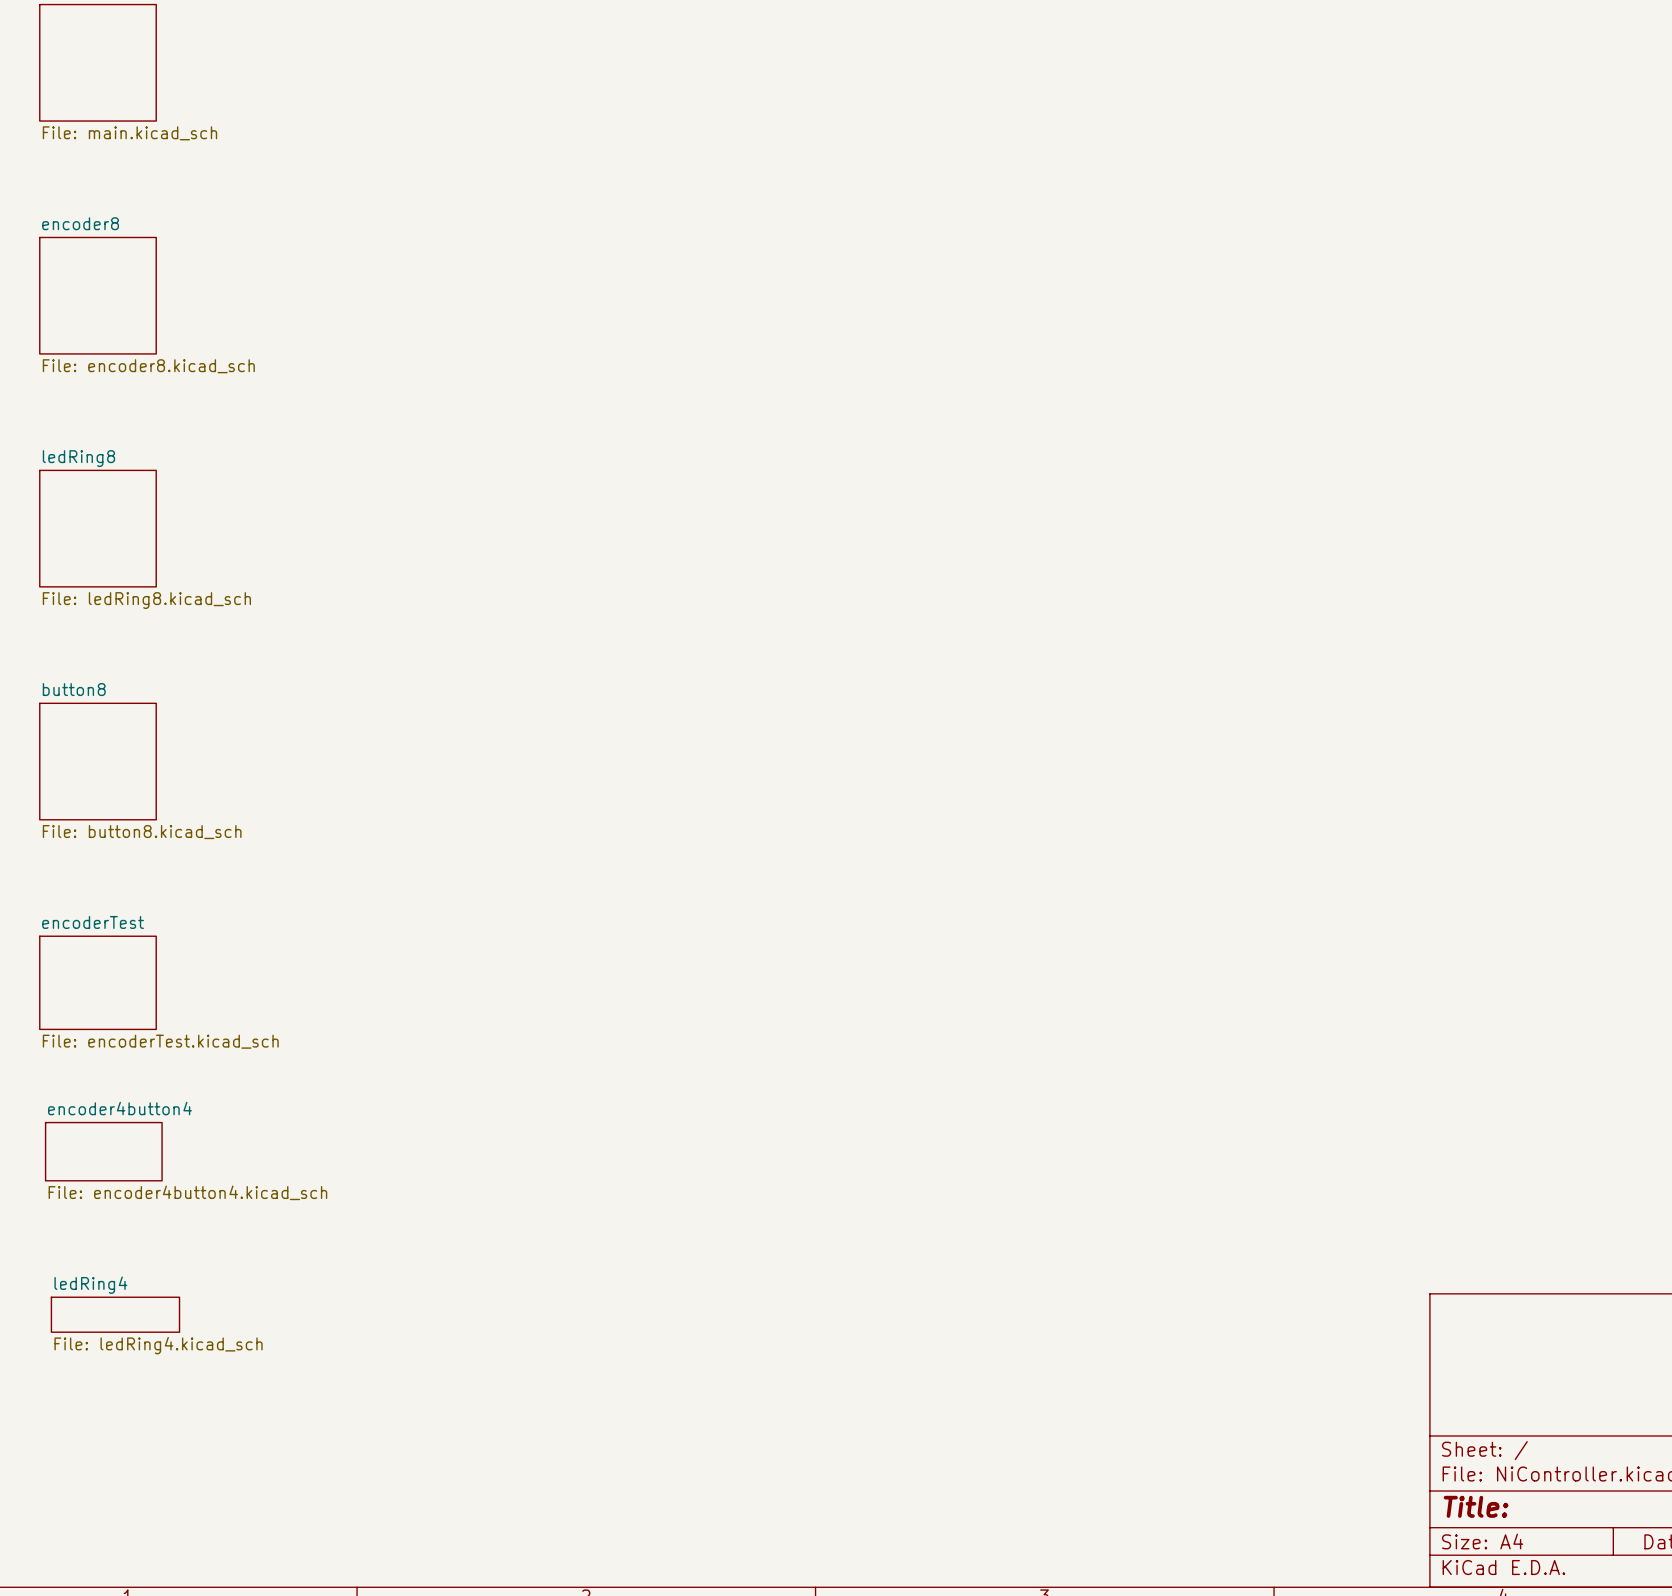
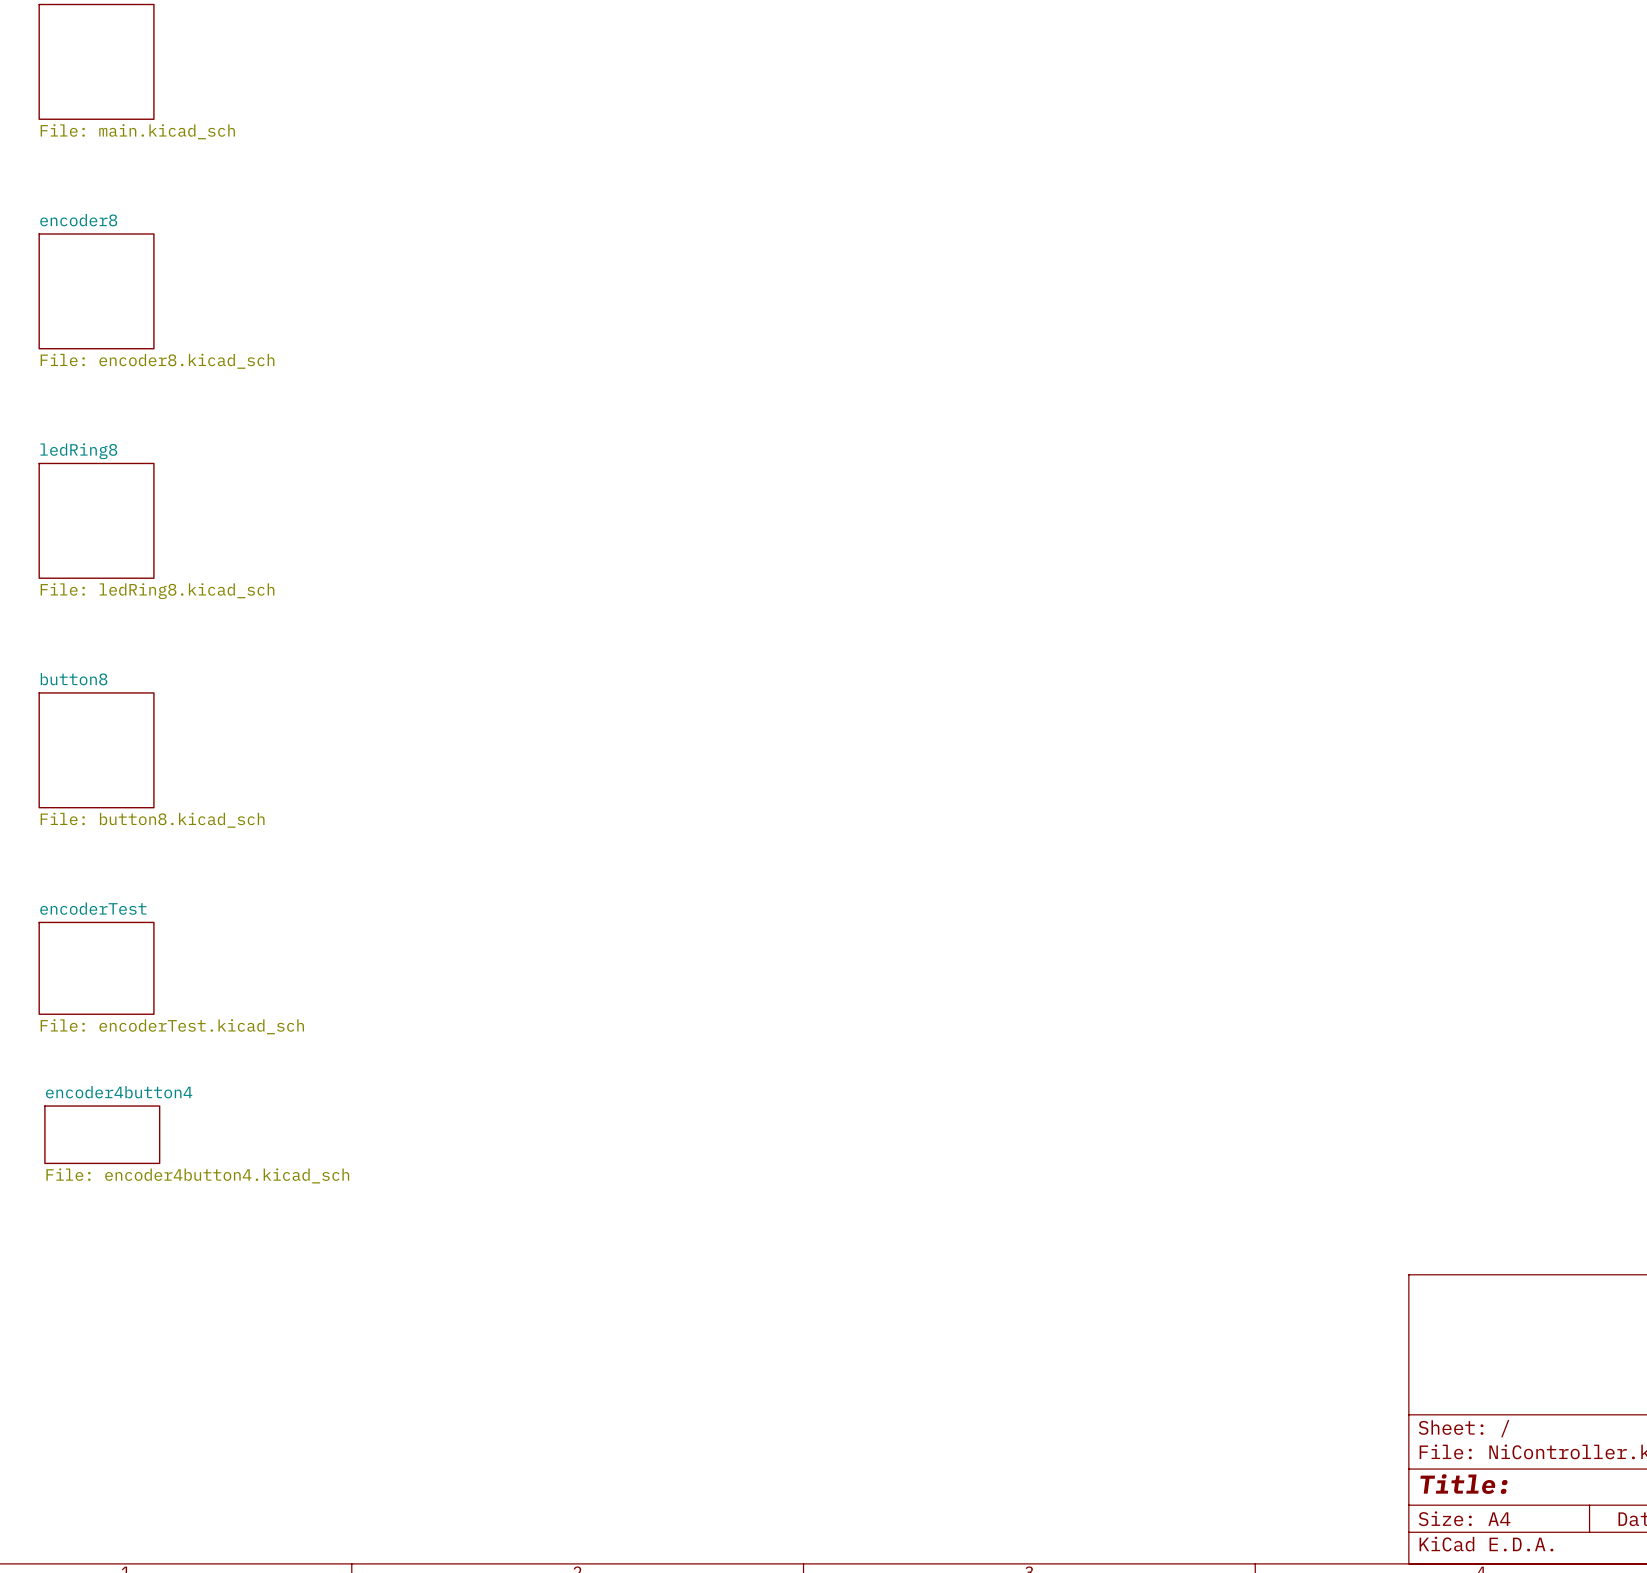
sheet ledRing4: File: ledRing4.kicad_sch (115, 1314) -> none

